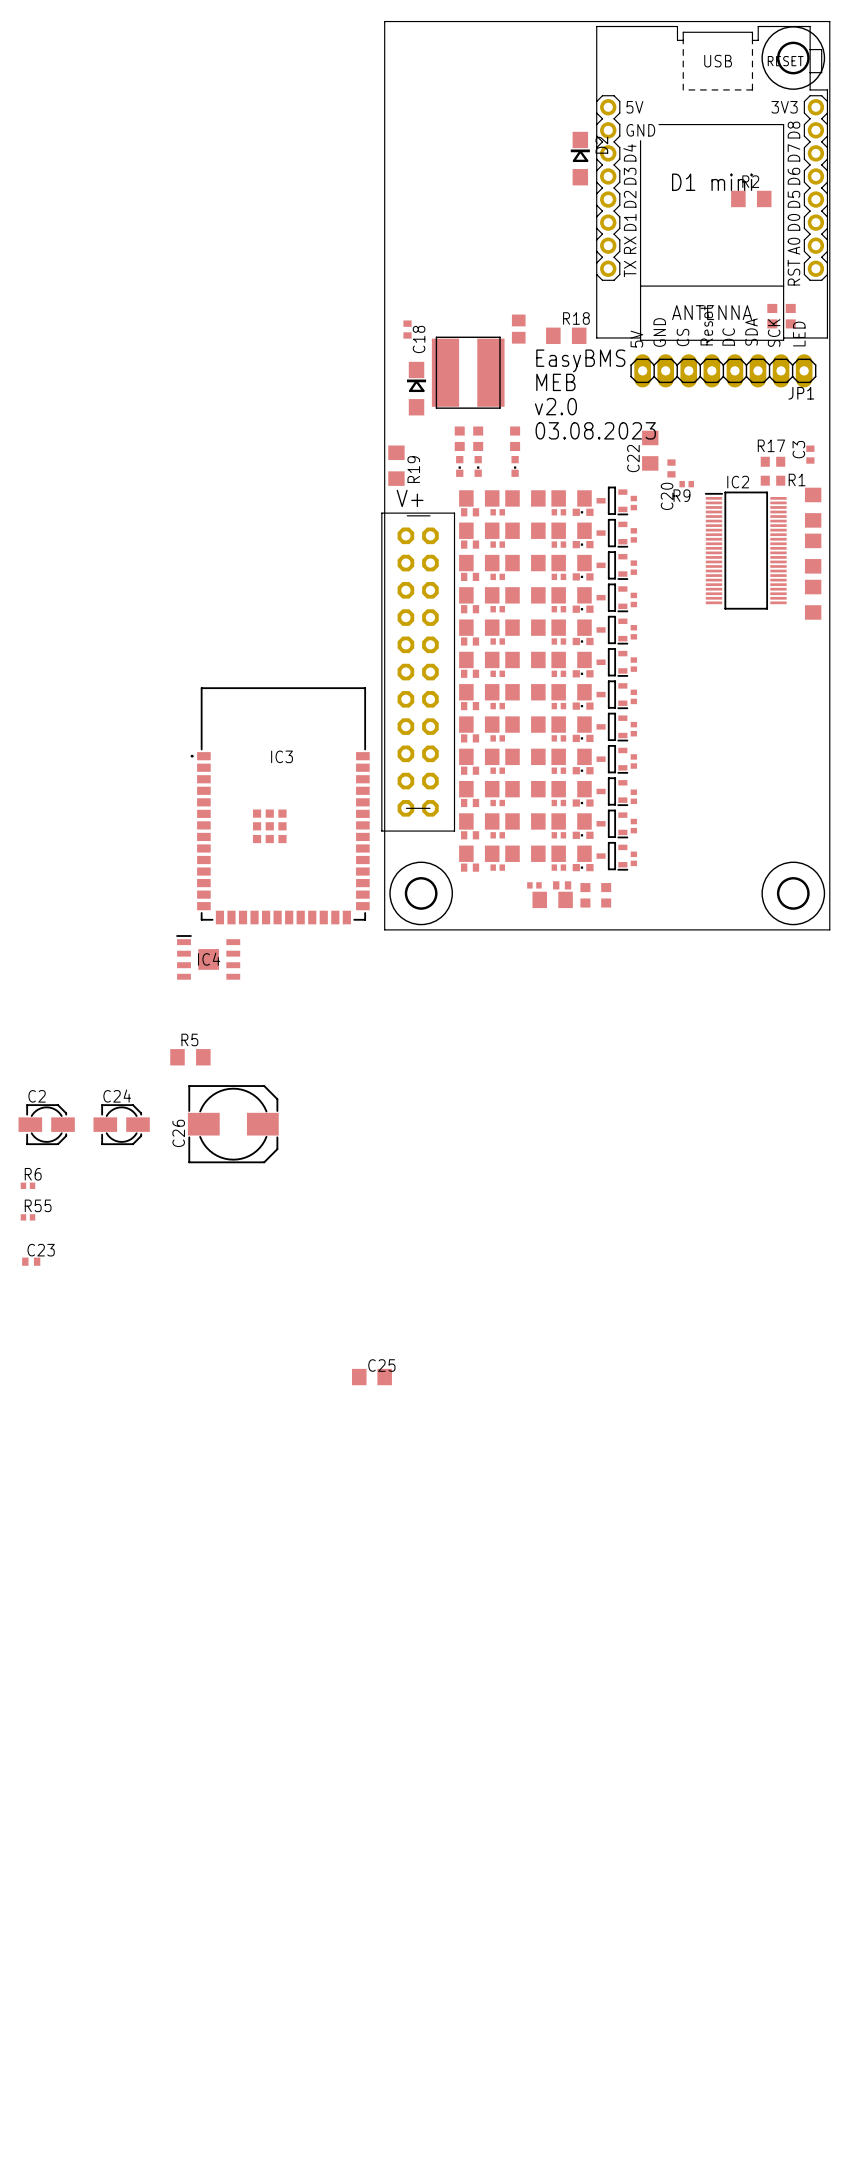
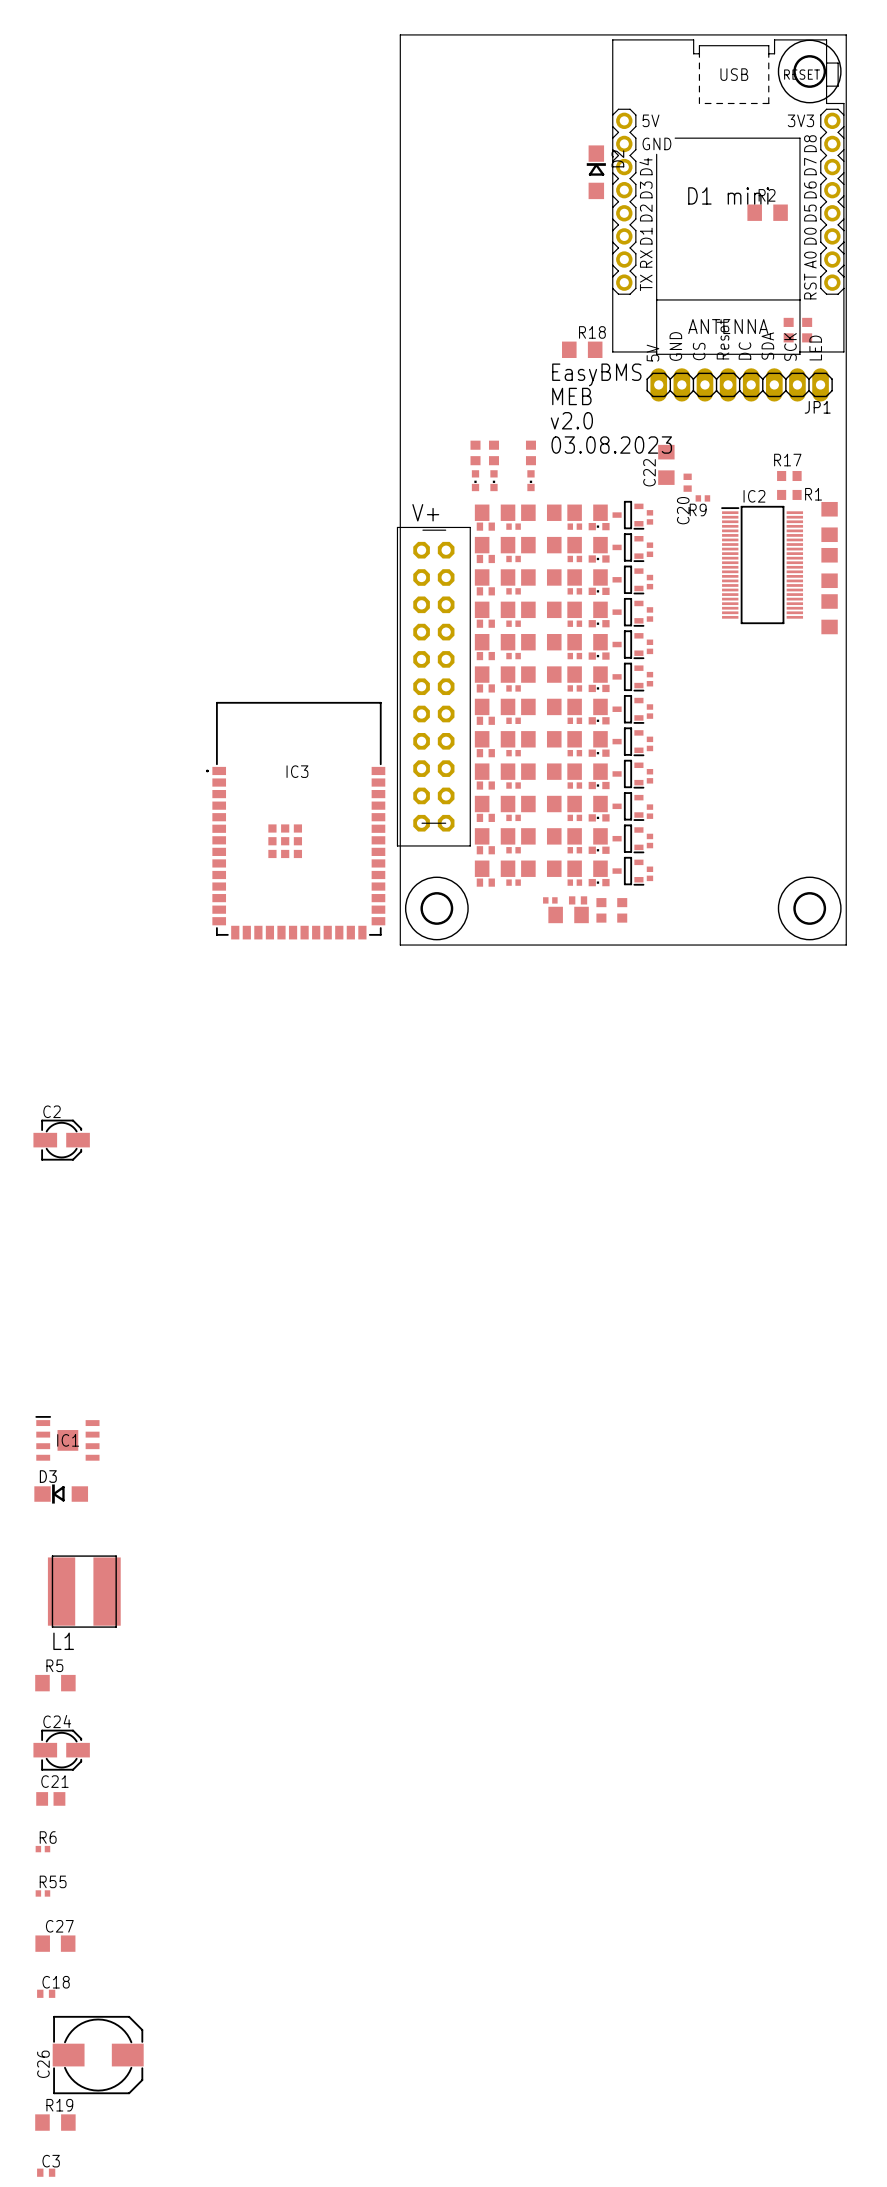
C18 rotation: 0° (407, 329) -> 90° clockwise (46, 1993)
C18 position: (407, 329) -> (46, 1993)
part: (518, 329) -> none
C18 name position: C18 (419, 339) -> C18 (56, 1982)
part: (468, 372) -> none
part: (416, 388) -> none
C3 rotation: 0° (810, 454) -> 90° clockwise (46, 2172)
C3 position: (810, 454) -> (46, 2172)
R19 rotation: 0° (396, 465) -> 90° clockwise (55, 2122)
R19 position: (396, 465) -> (55, 2122)
R19 name position: R19 (413, 469) -> R19 (59, 2105)
IC4: (208, 957) -> none
R5 position: (190, 1057) -> (55, 1683)
C24 position: (121, 1124) -> (61, 1750)
C26 position: (233, 1124) -> (98, 2055)
R6 position: (27, 1185) -> (42, 1849)
R55 position: (27, 1217) -> (42, 1893)
C23: (31, 1261) -> none
C25: (371, 1377) -> none
IC1: none -> (67, 1438)
D3: none -> (61, 1494)
L1: none -> (84, 1591)
C21: none -> (50, 1798)
C27: none -> (55, 1943)

